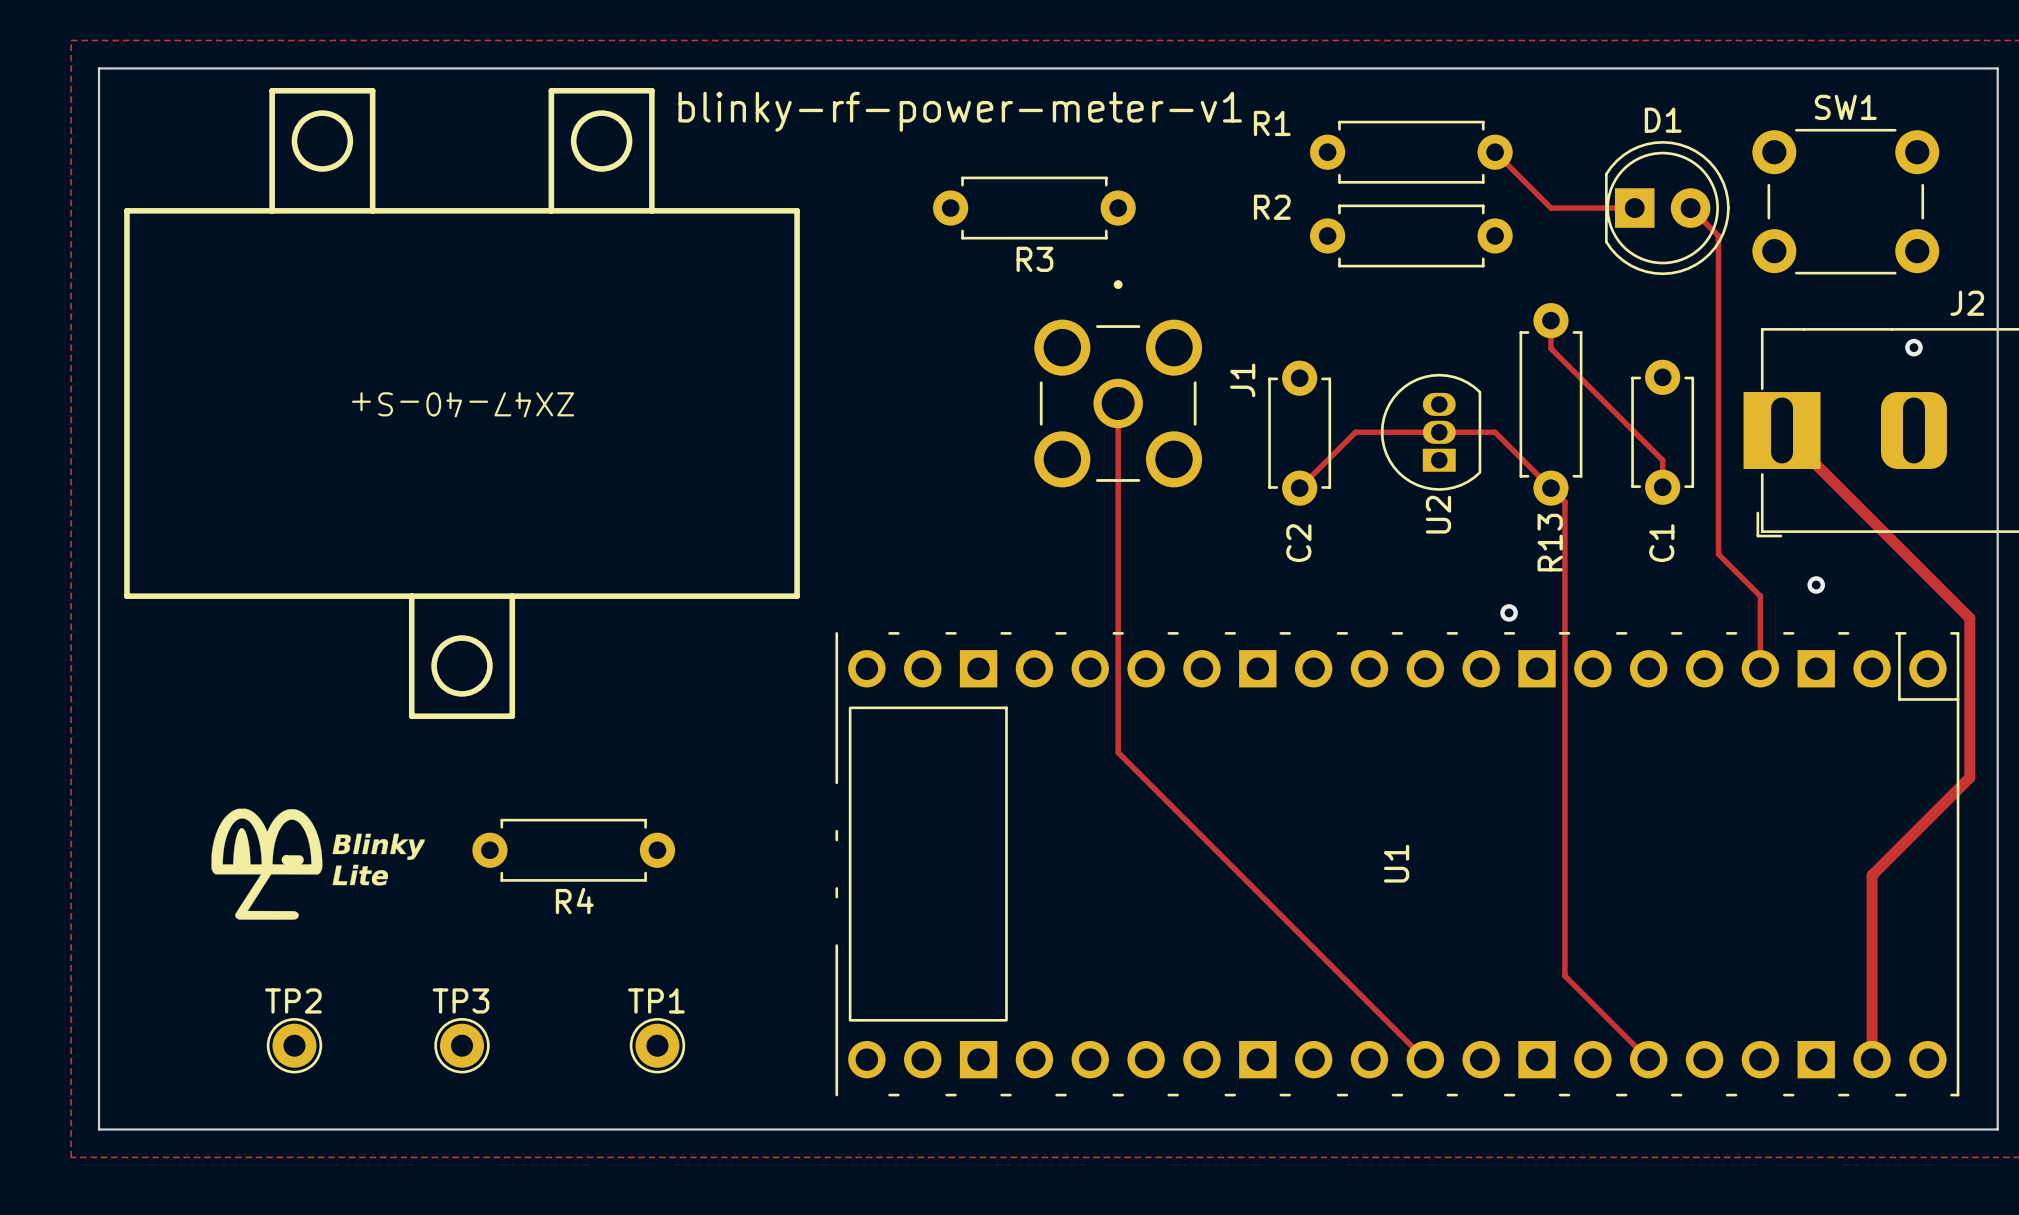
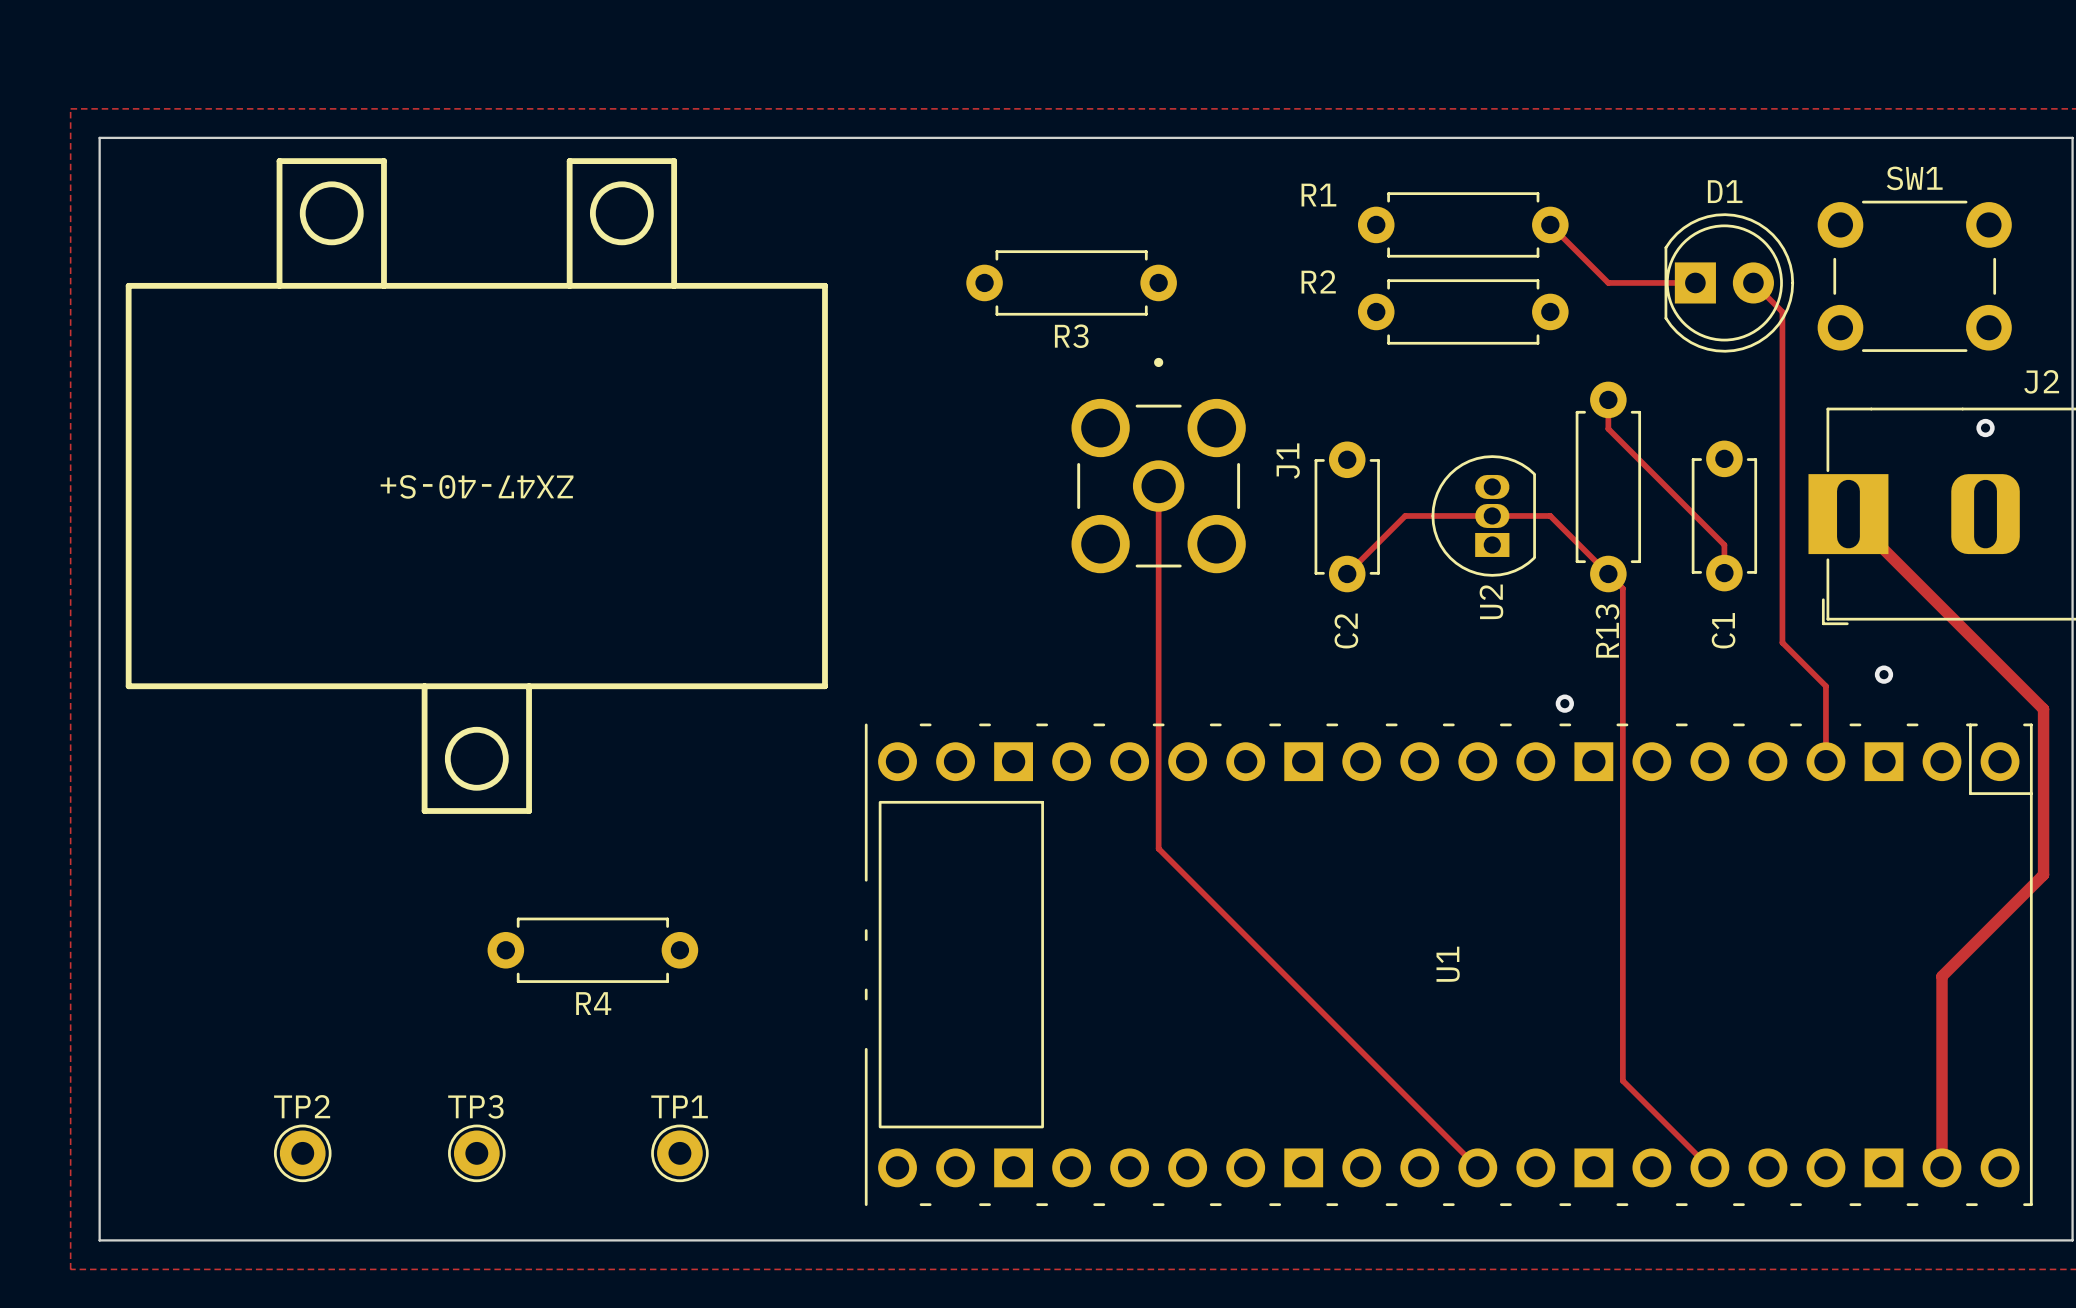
text: blinky-rf-power-meter-v1 (960, 111) -> none
drawing: [211, 808, 425, 920] -> none

